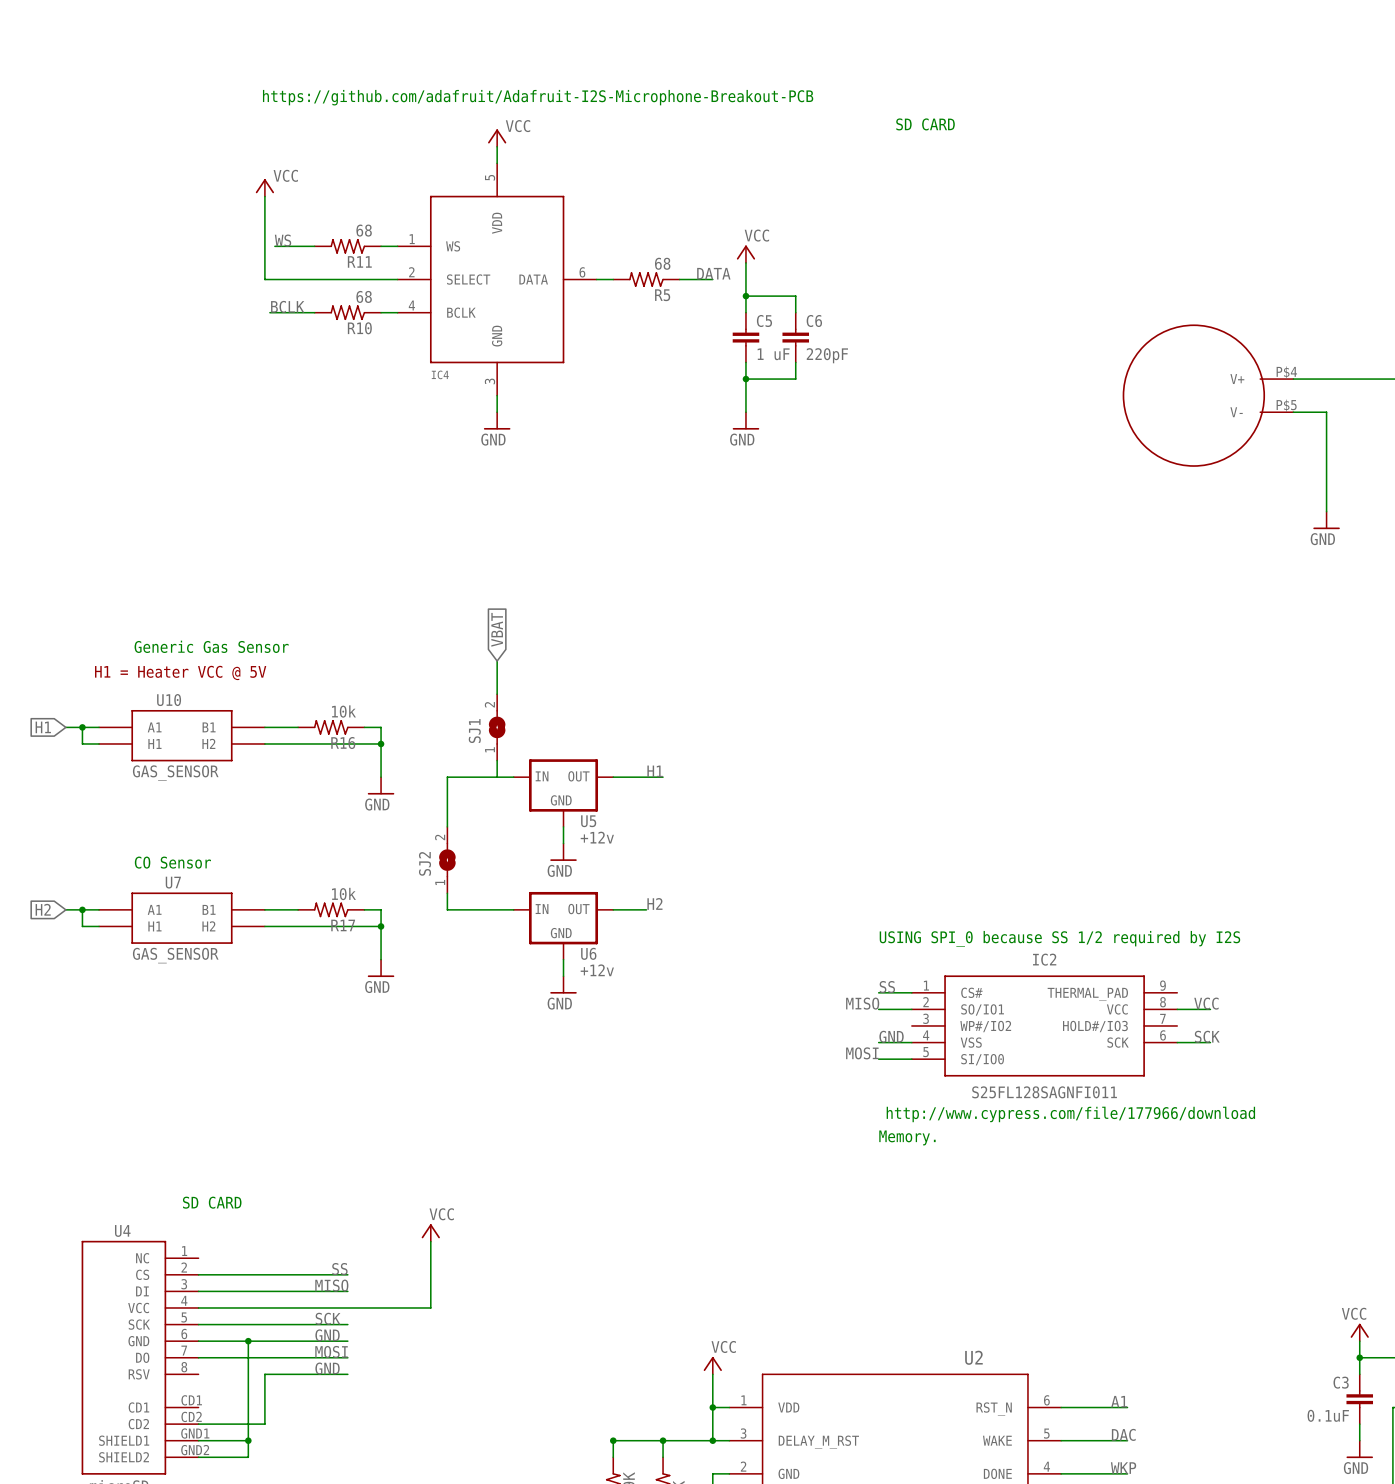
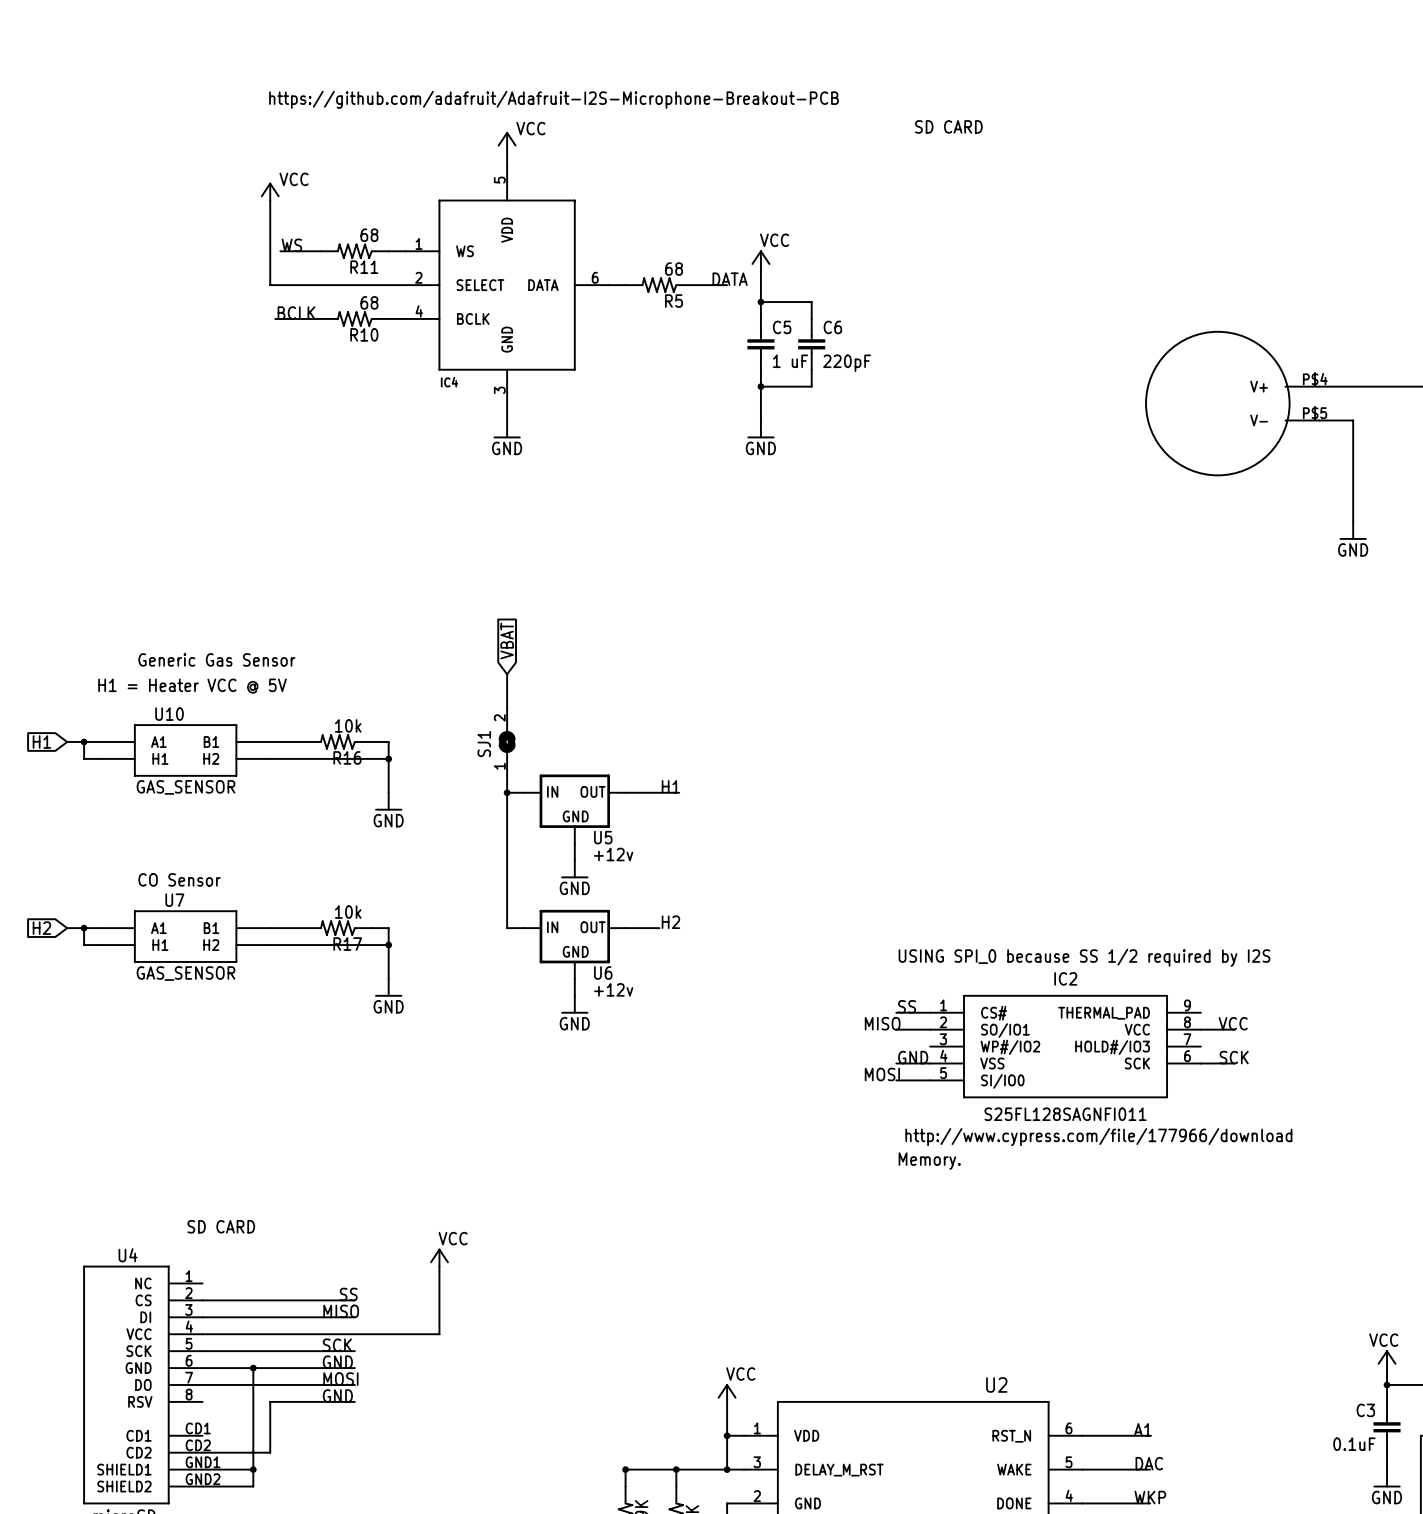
wire: (497, 777) (447, 777) (447, 826) -> (507, 792) (507, 928)
junction: none -> (507, 792)
SJ2: (447, 860) -> none
wire: (447, 893) (447, 909) (497, 909) -> none

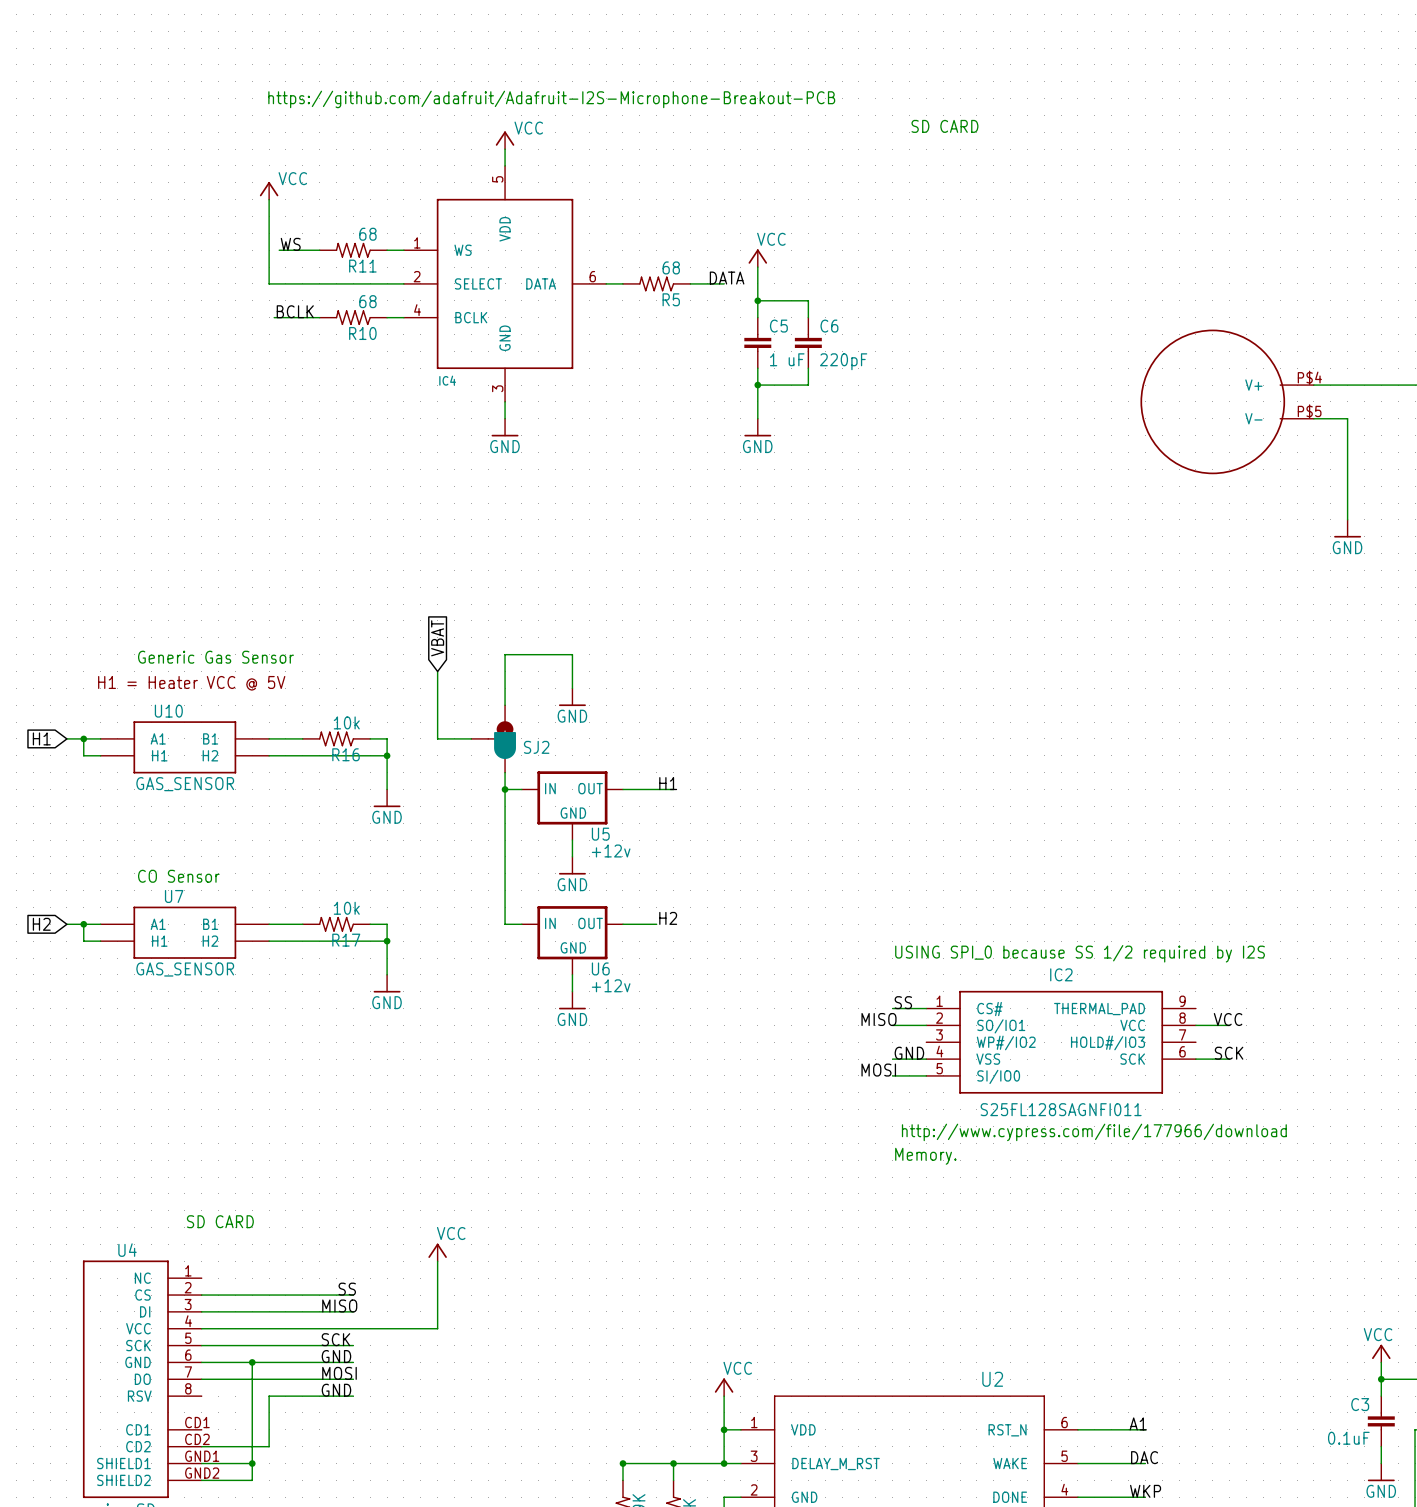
global label position: VBAT (507, 640) -> VBAT (437, 638)
wire: none -> (437, 671) (437, 738) (471, 738)
wire: none -> (505, 671) (505, 654) (572, 654) (572, 688)
power symbol: none -> GND (572, 697)
SJ2: none -> (493, 738)
SJ1: (507, 742) -> none

